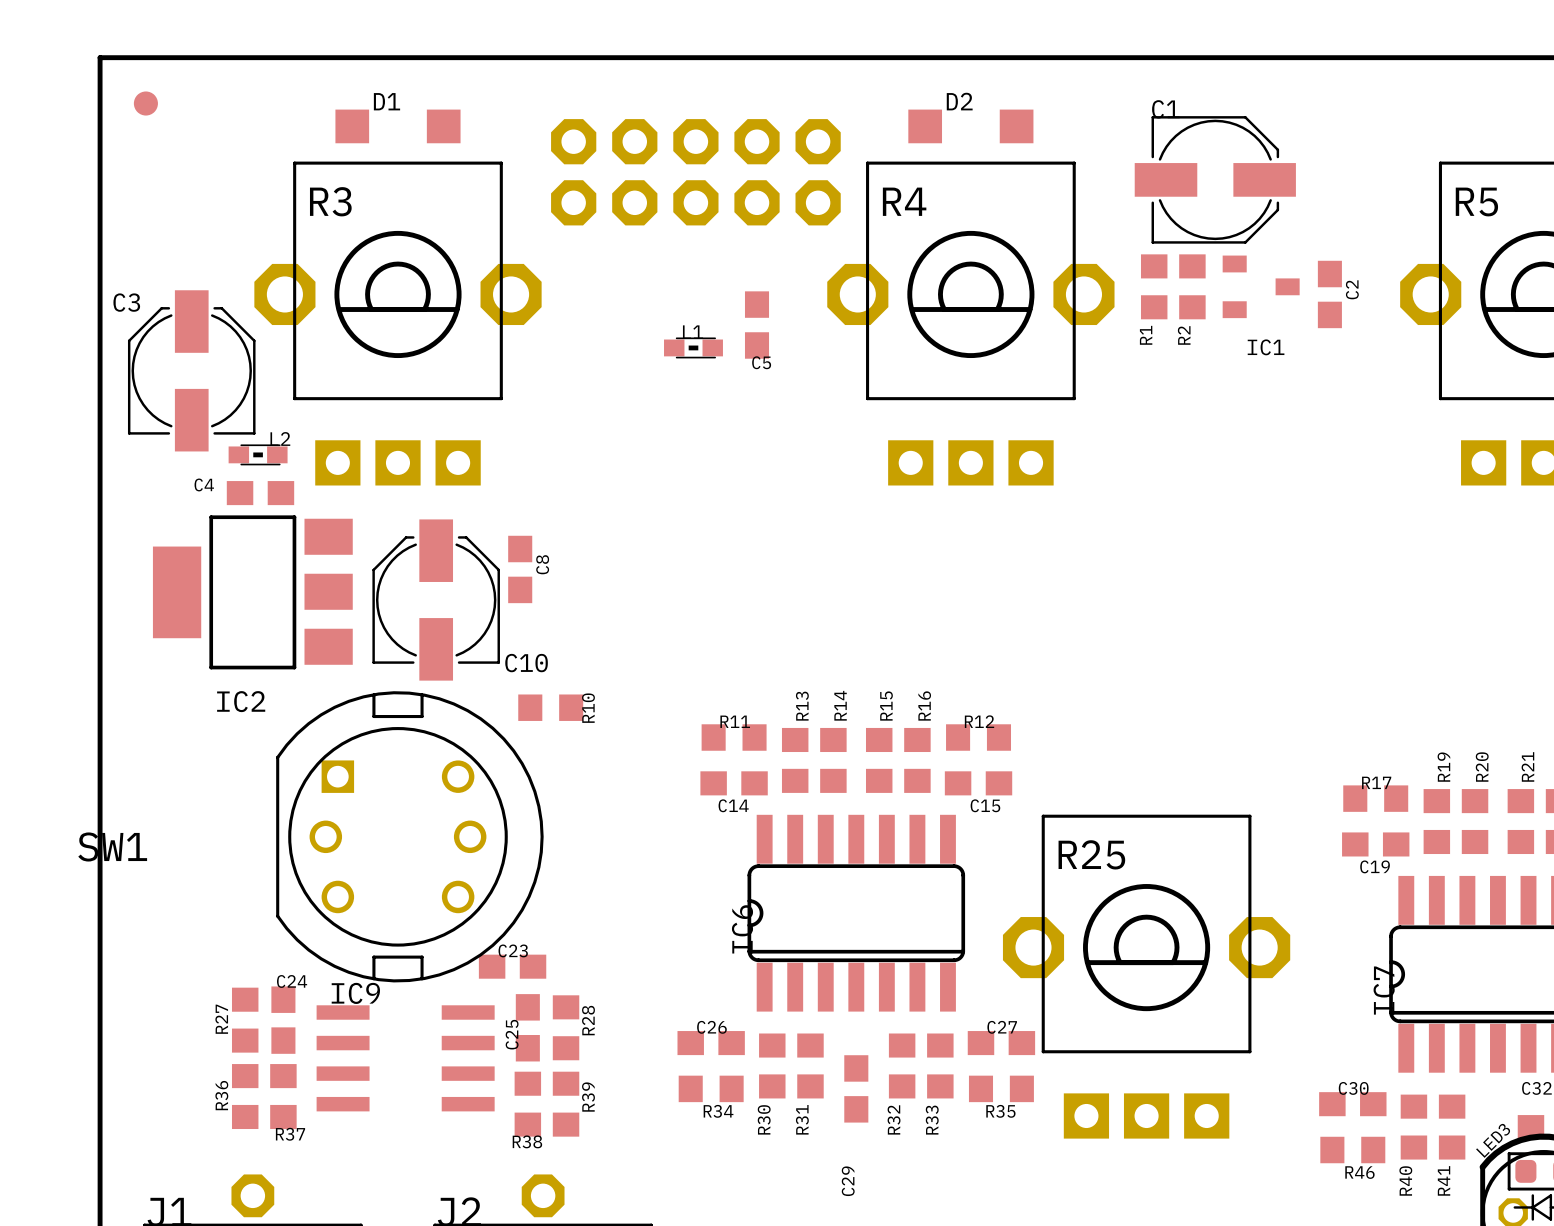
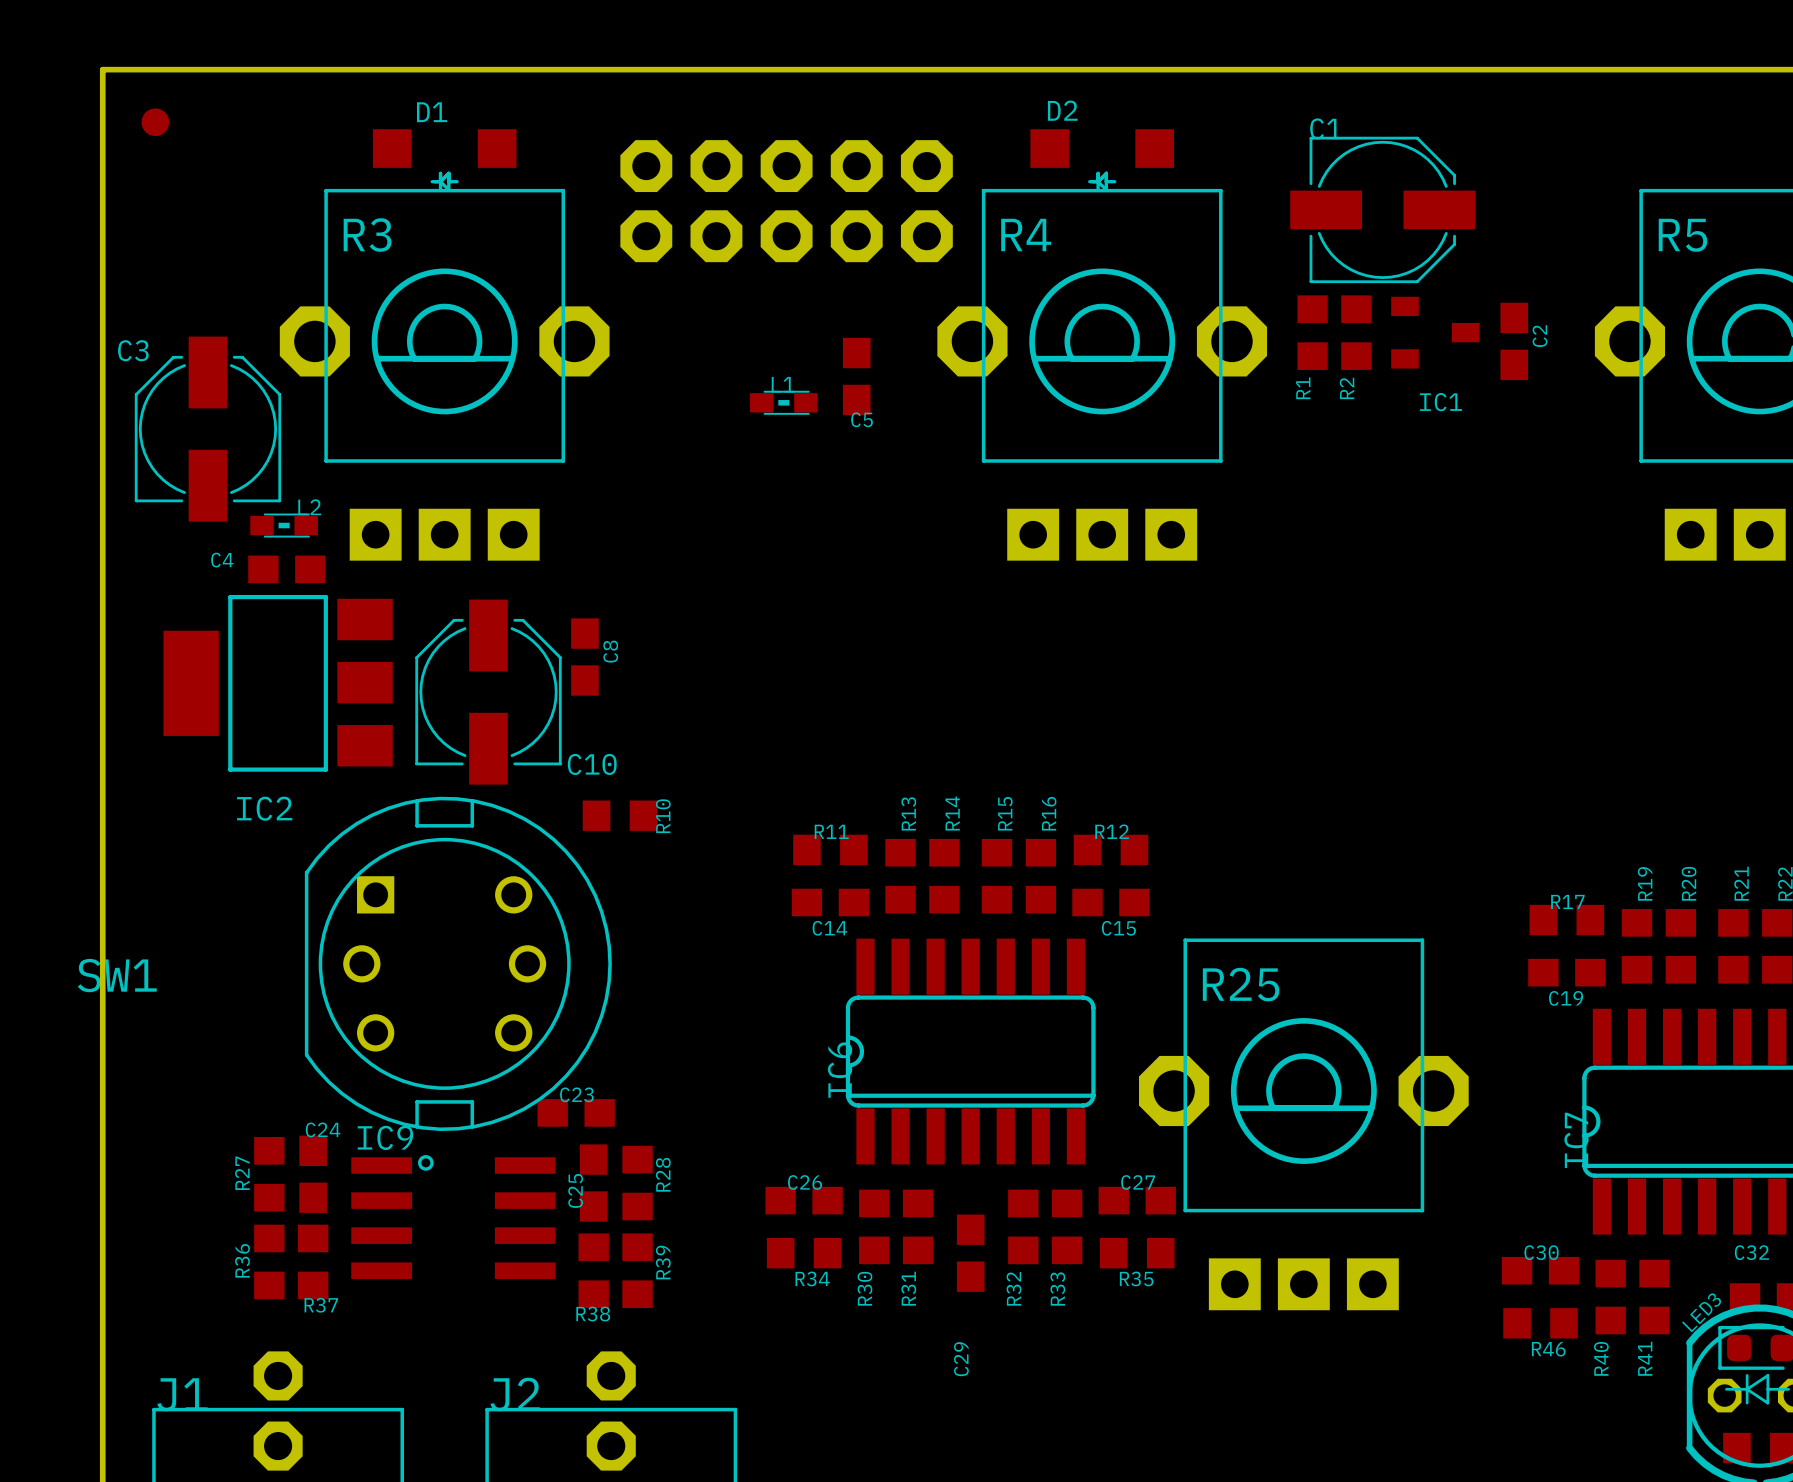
D1 footprint: [335, 109, 461, 144] -> [372, 129, 517, 192]
D2 footprint: [908, 109, 1034, 144] -> [1030, 129, 1175, 192]
IC9 footprint: [316, 1005, 495, 1112] -> [351, 1155, 556, 1280]

